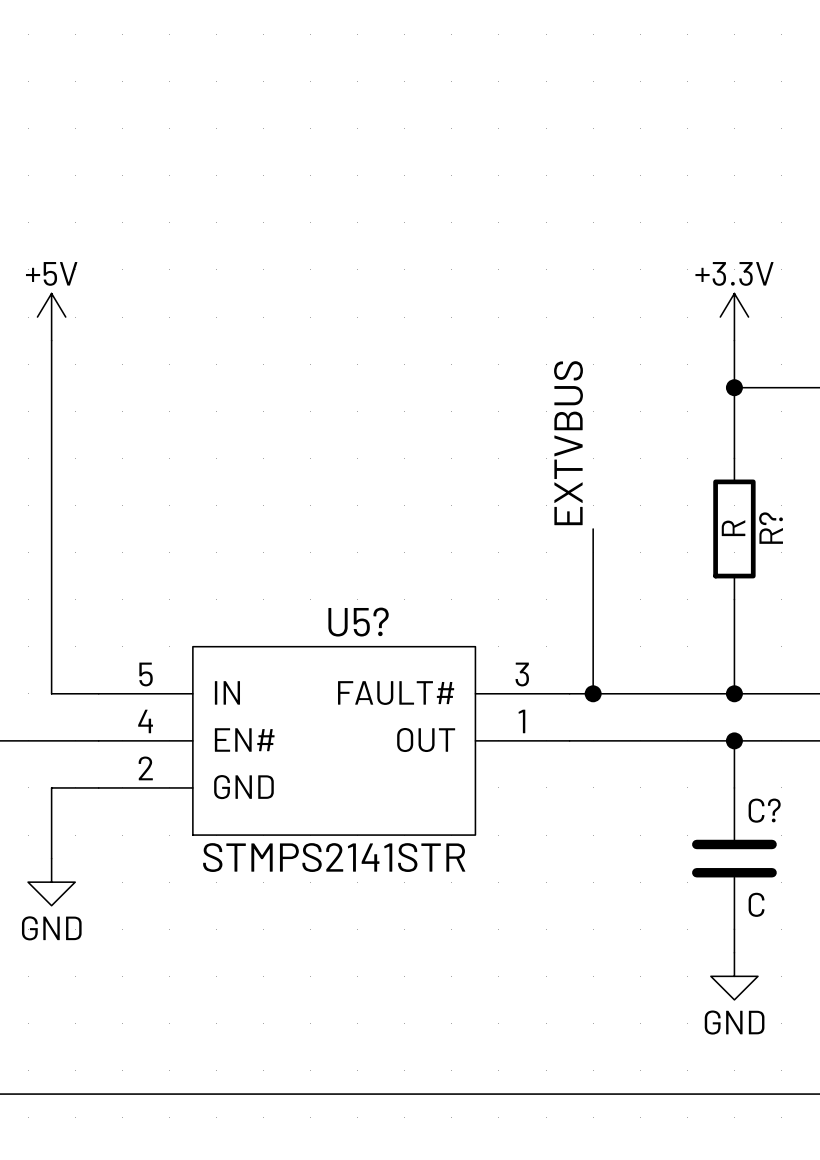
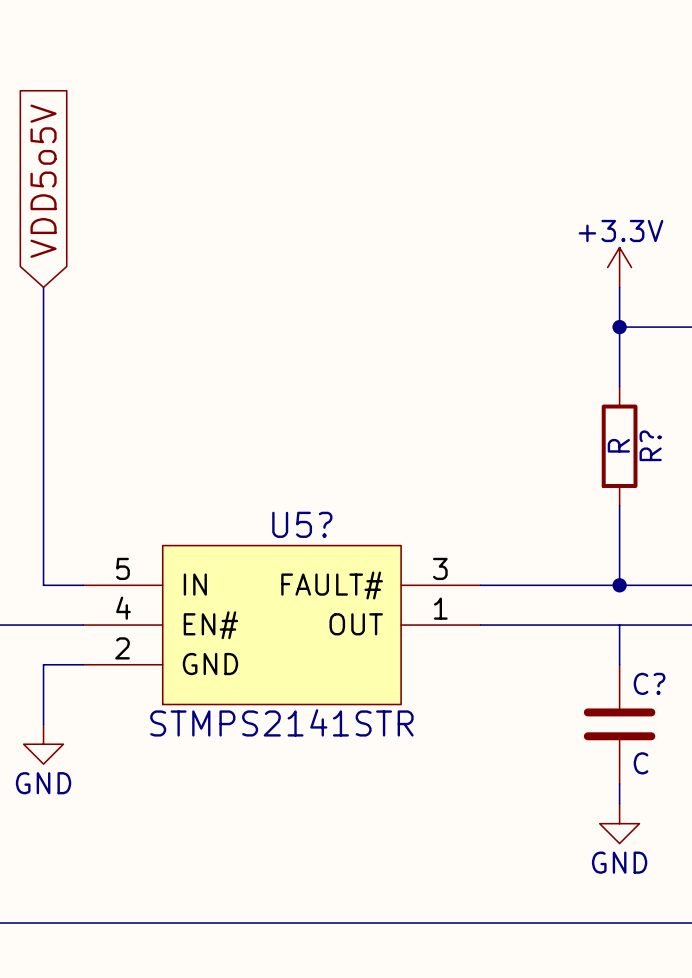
global label: none -> VDD5o5V (43, 181)
power symbol: +5V (51, 317) -> none
label: EXTVBUS (568, 443) -> none
wire: (593, 528) (593, 693) -> none
junction: (593, 693) -> none
junction: (734, 740) -> none

